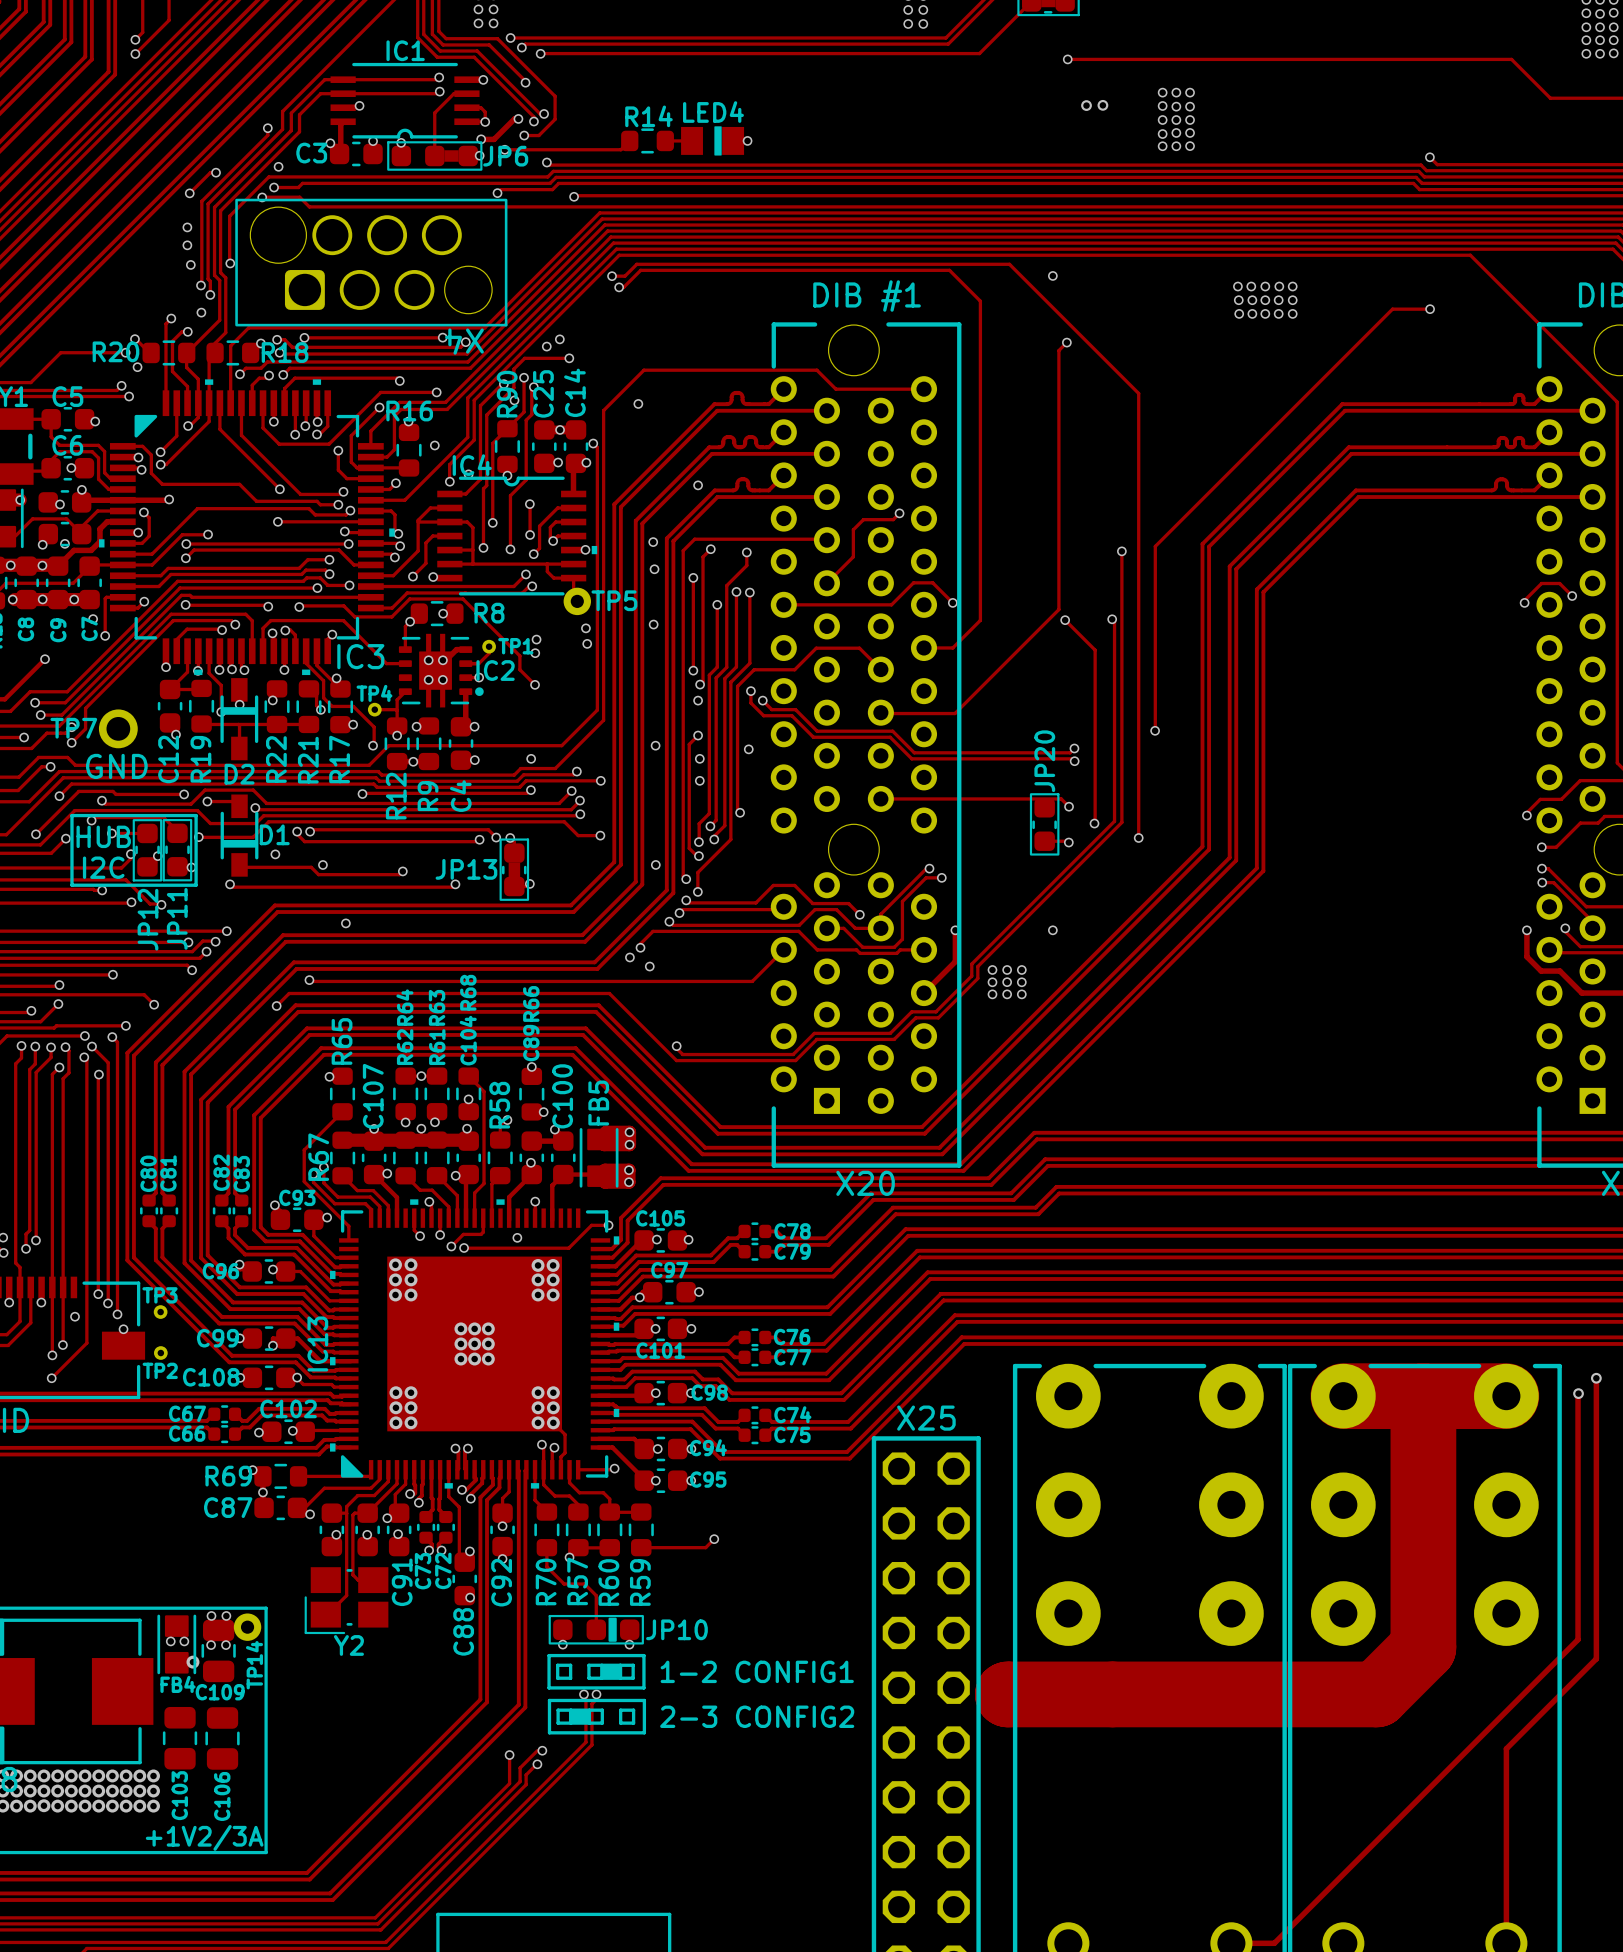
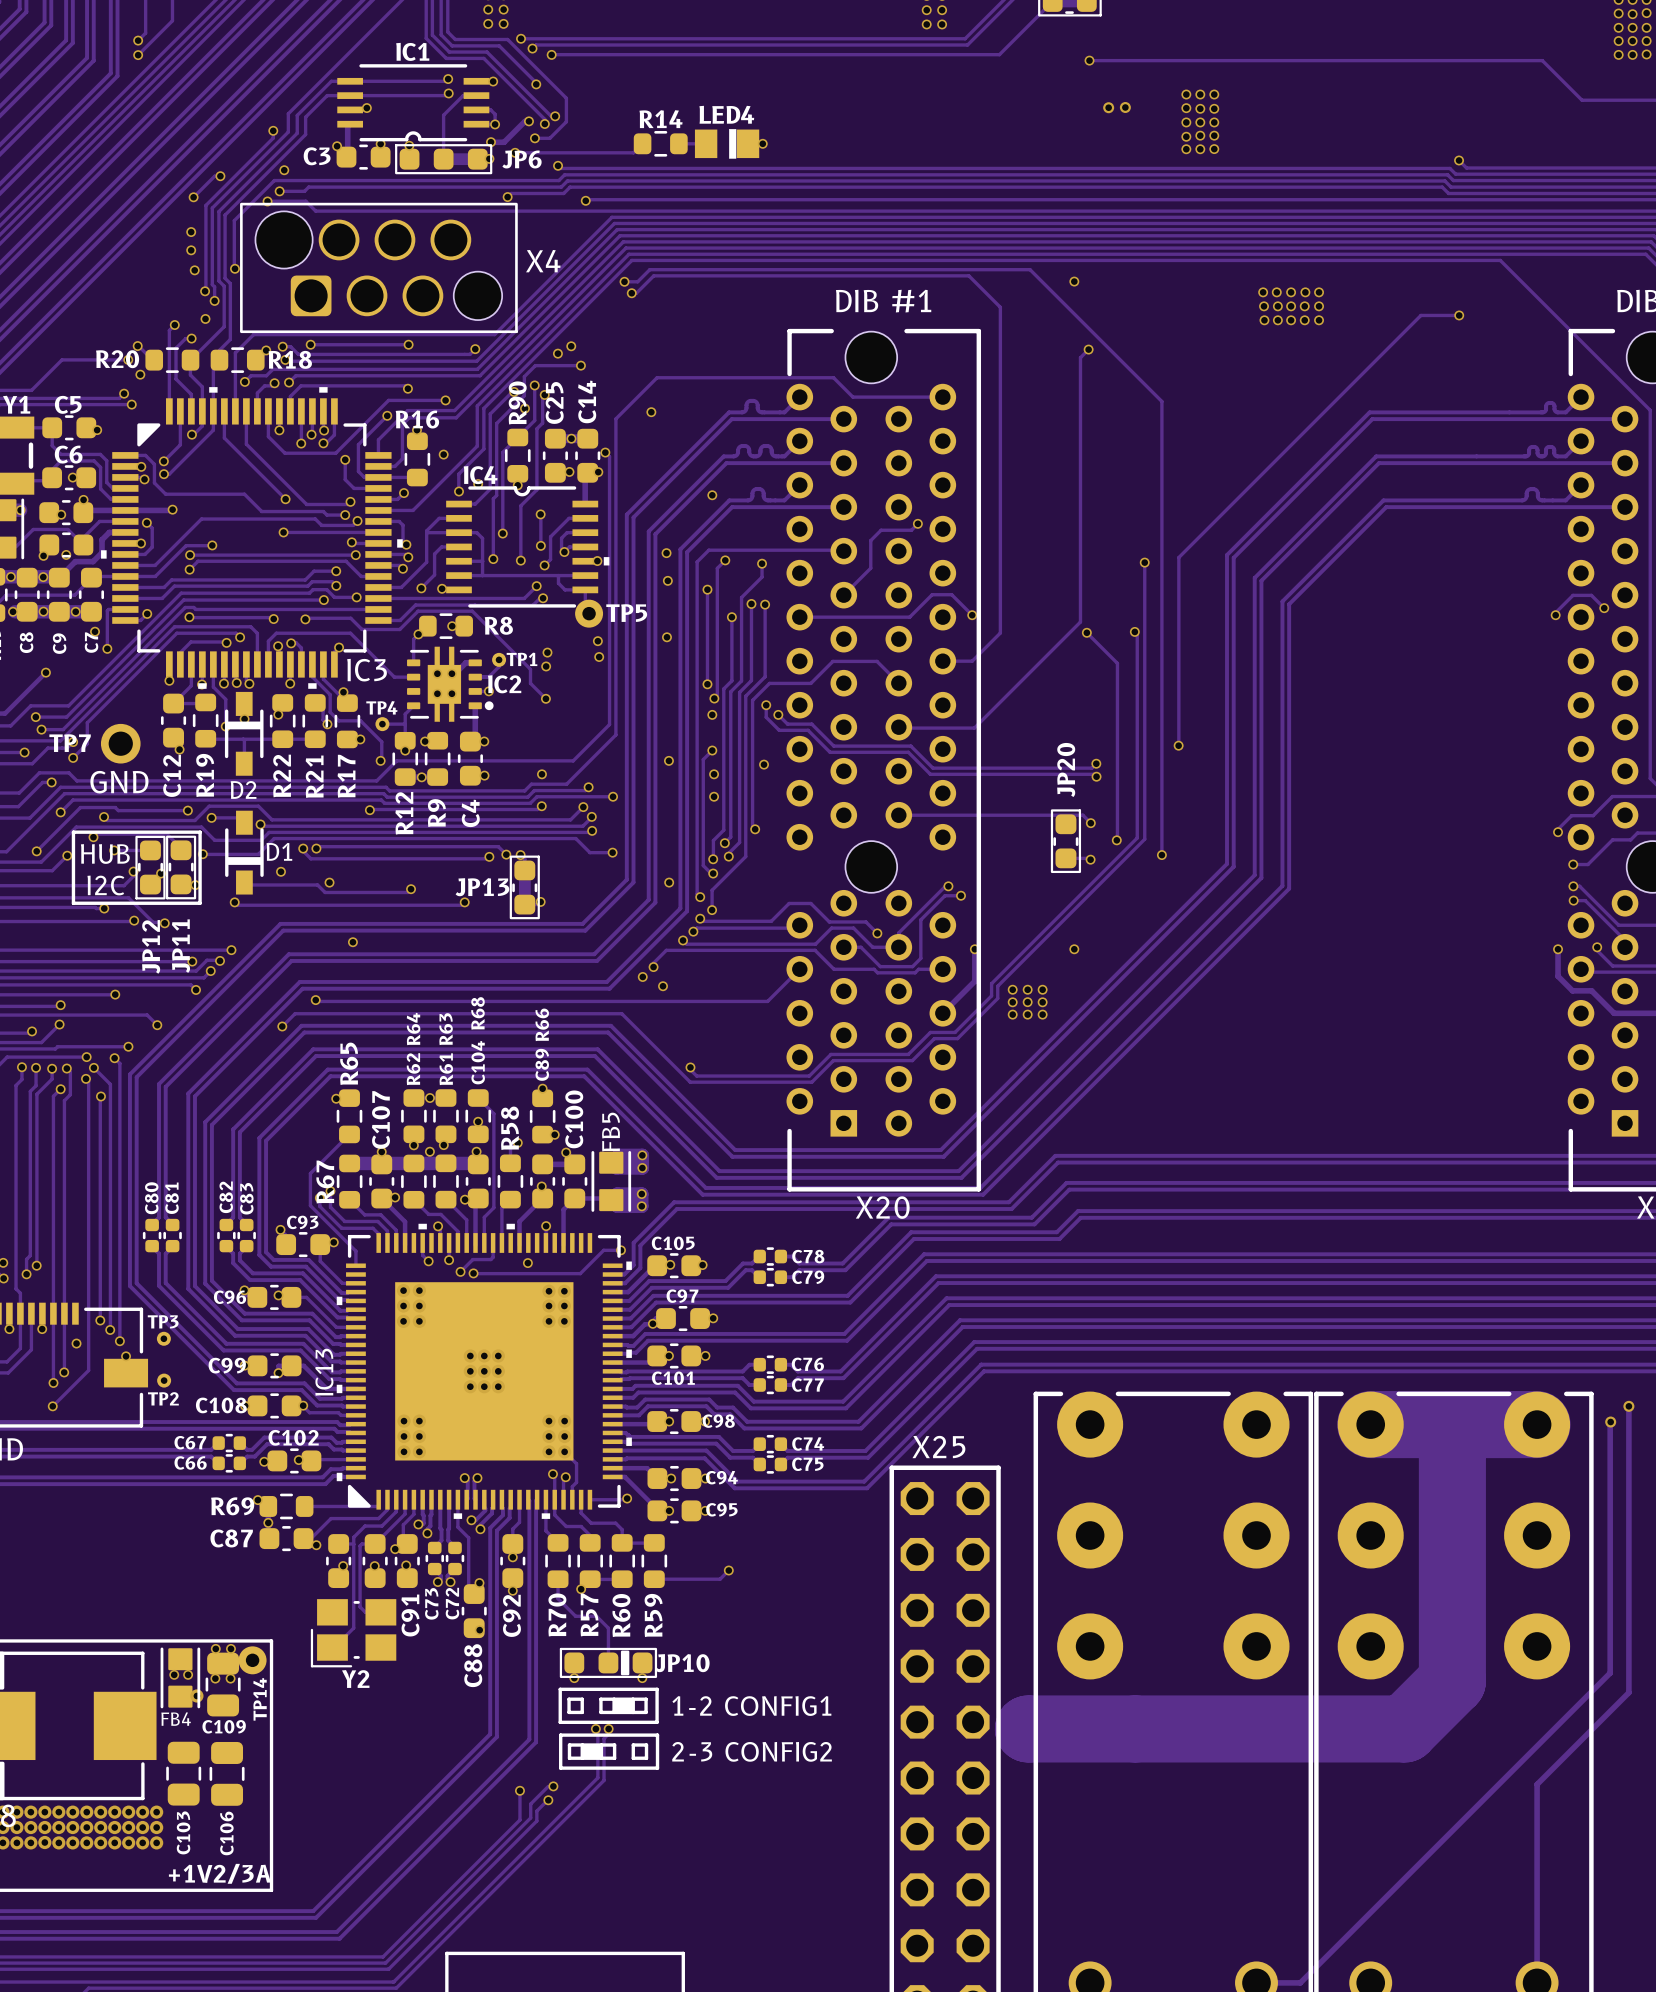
track: (400, 337) (442, 337) -> none
via position: (442, 337) -> (408, 344)
X4 name rotation: 0° (464, 341) -> 180° (543, 261)
X4 name position: X4 (464, 341) -> X4 (543, 261)

